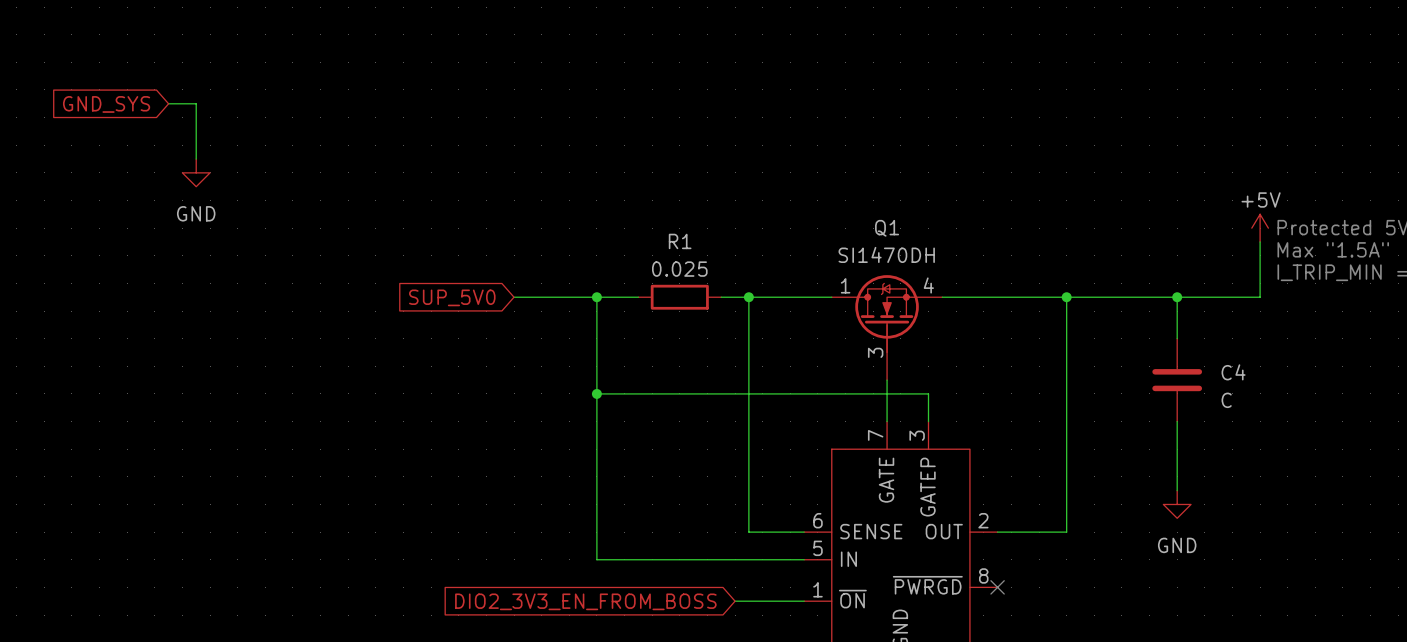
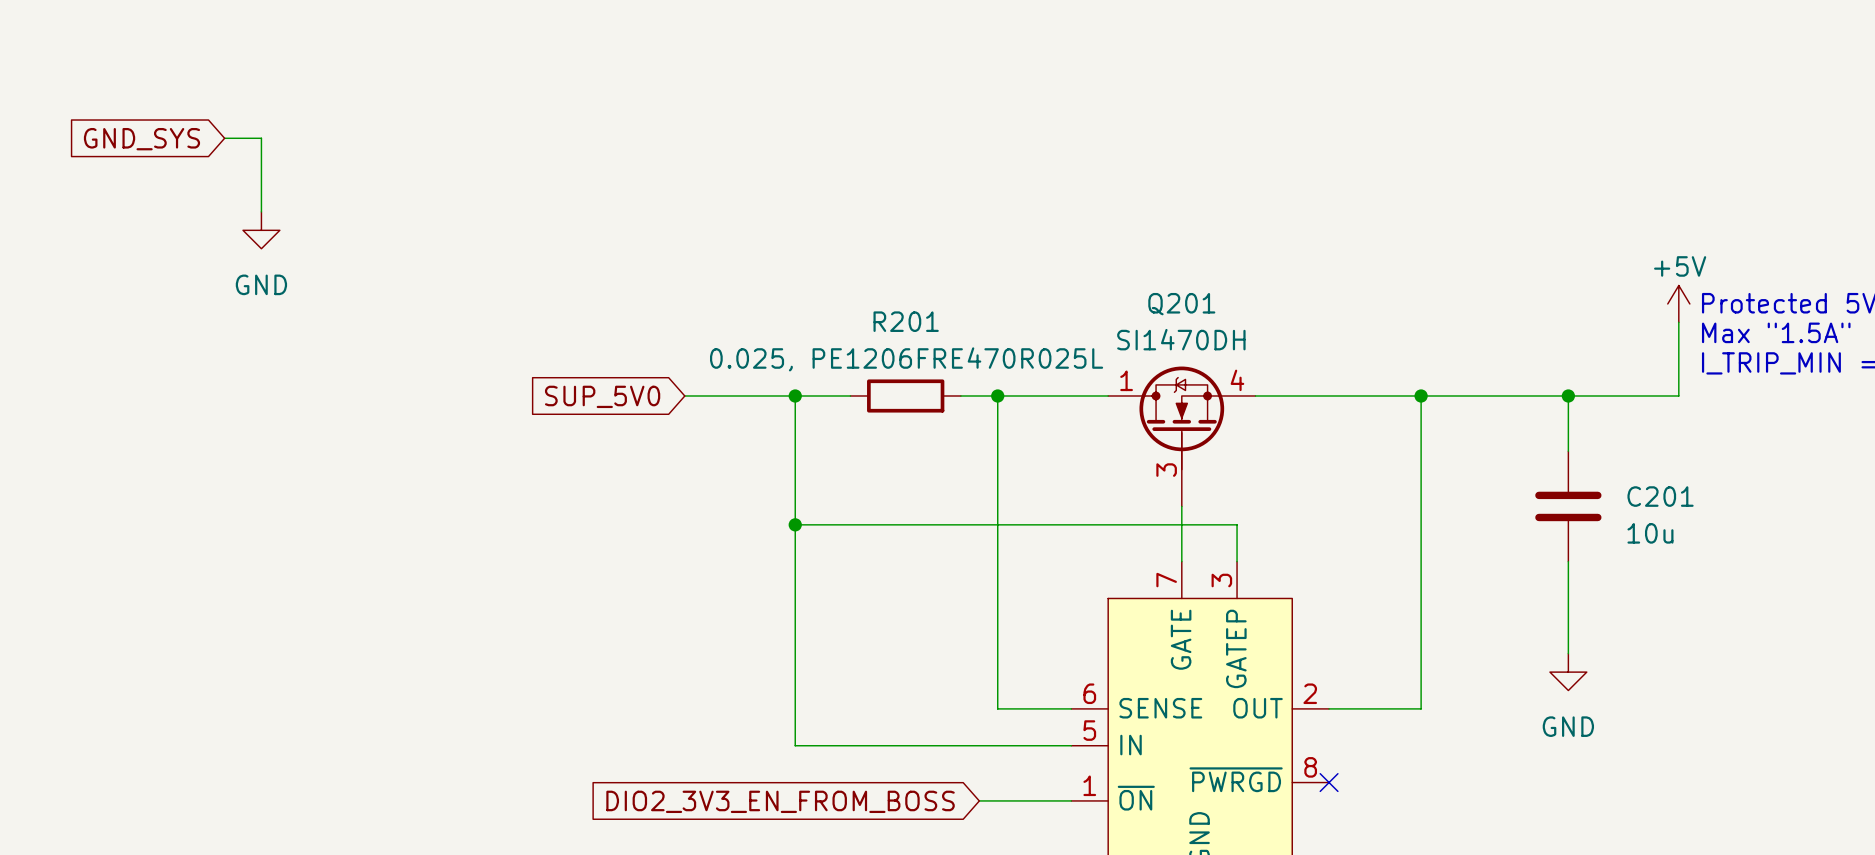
Q1 name: Q1 (887, 228) -> Q201 (1181, 304)
R1 name: R1 (680, 241) -> R201 (906, 321)
R1 value: 0.025 (679, 269) -> 0.025, PE1206FRE470R025L (906, 359)
C4 name: C4 (1233, 372) -> C201 (1660, 496)
C4 value: C (1226, 400) -> 10u (1650, 533)

